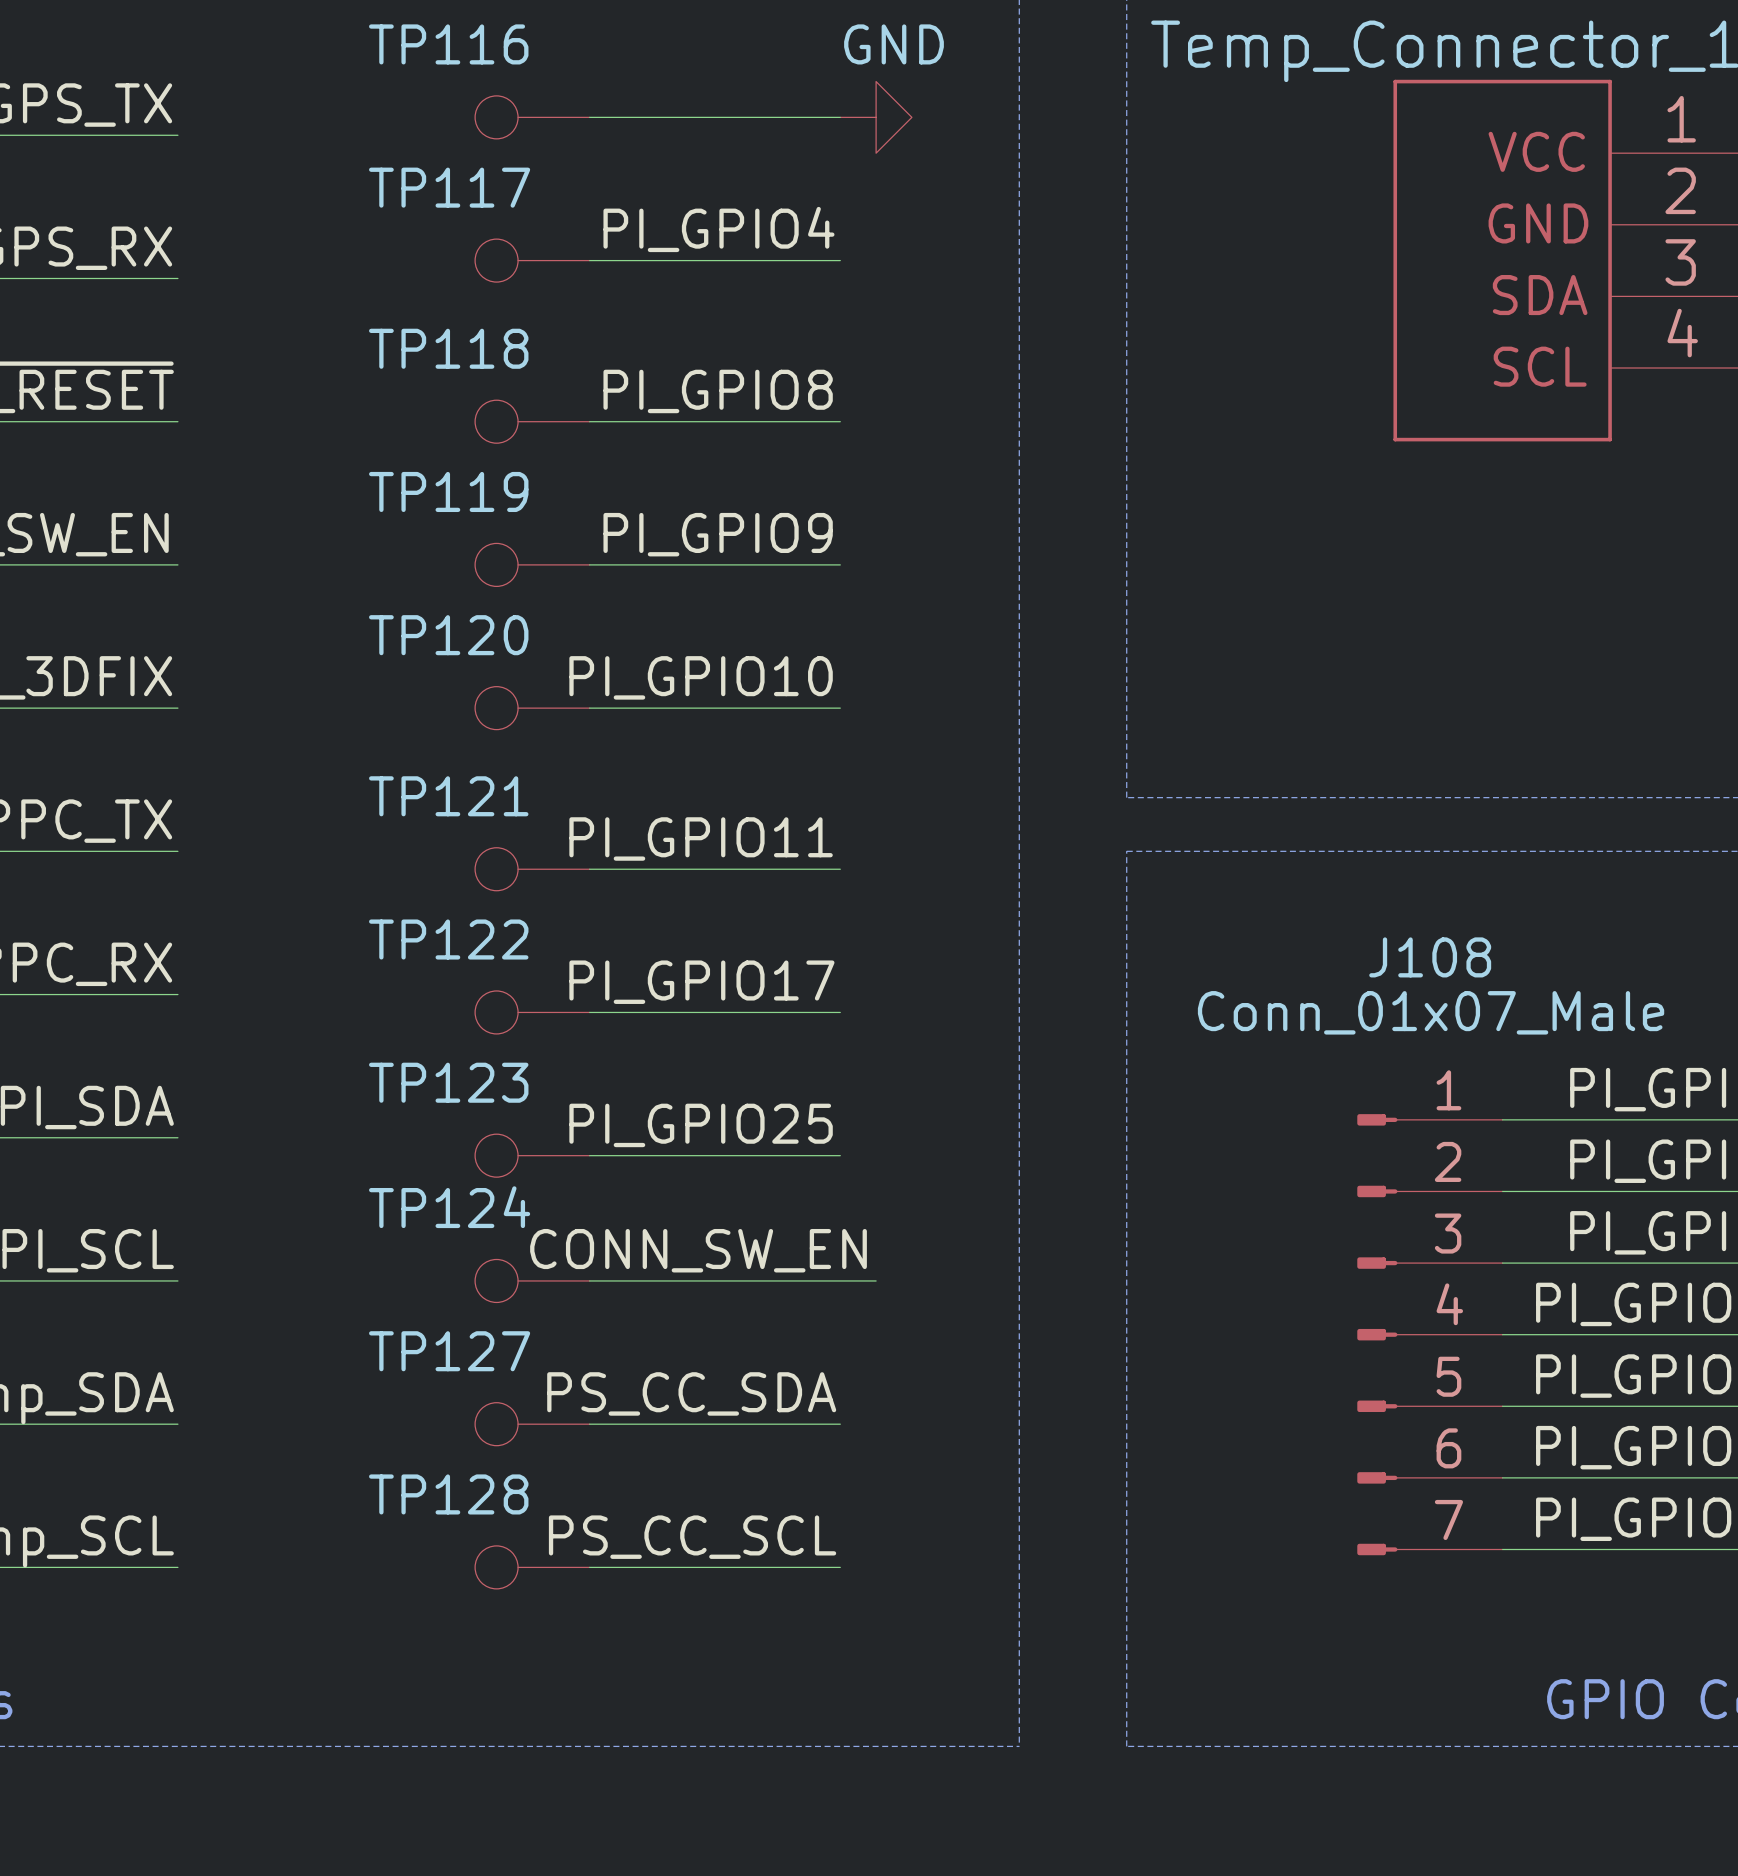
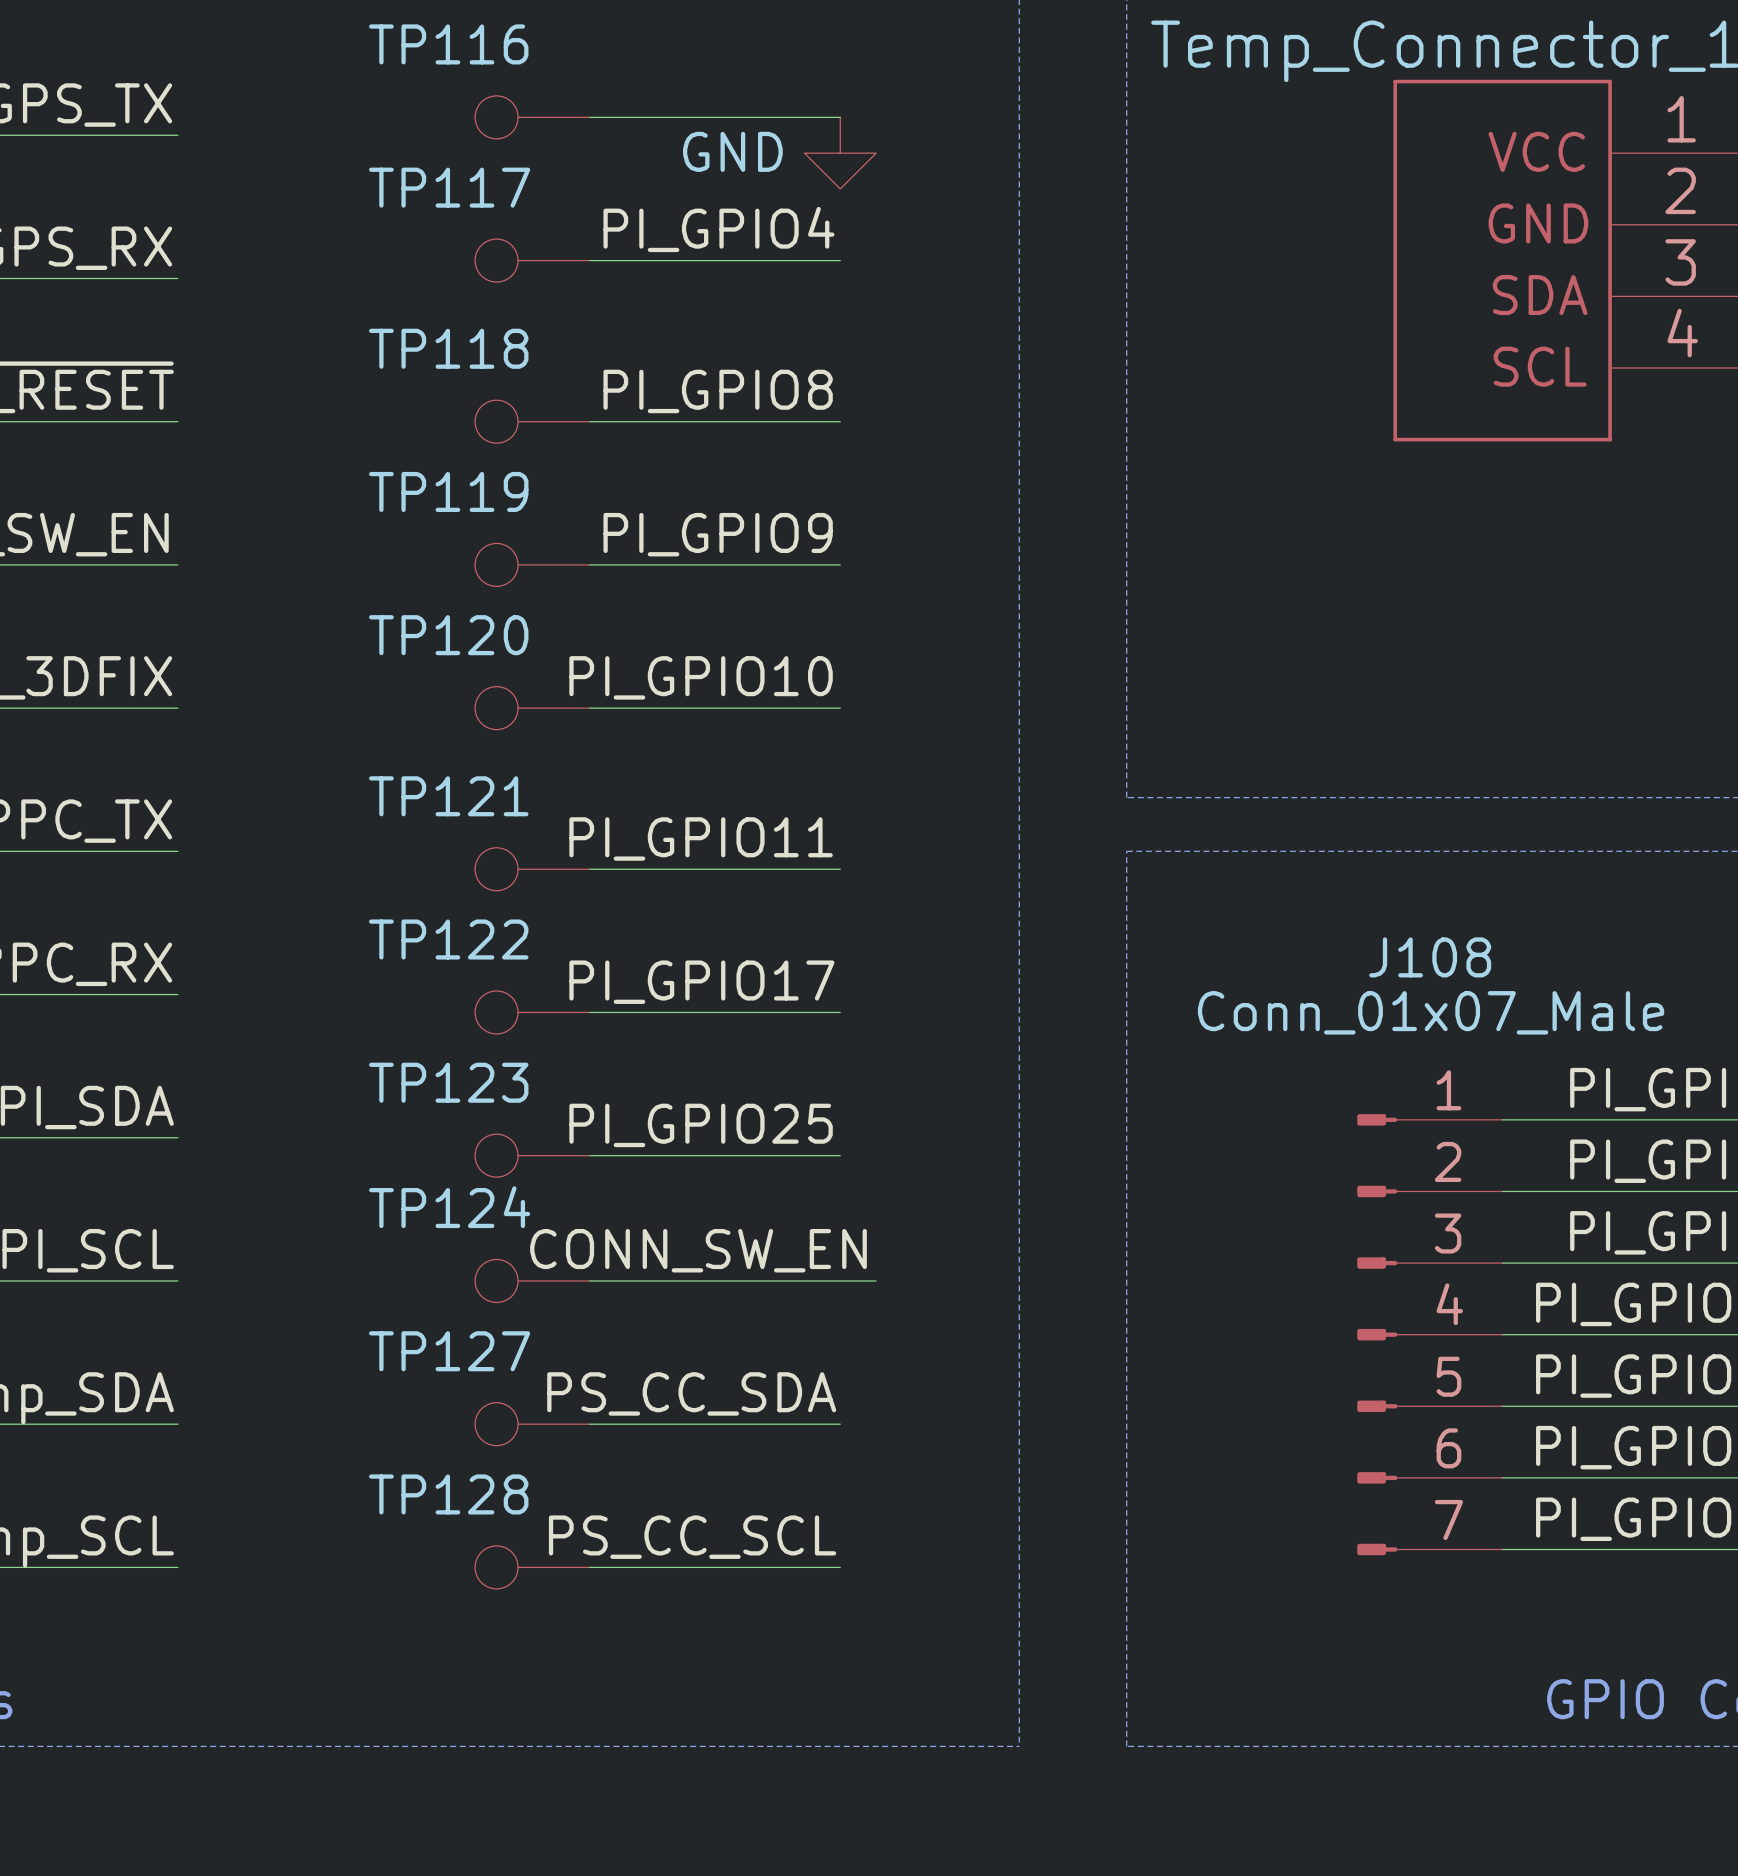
power symbol text position: GND (893, 44) -> GND (732, 151)
power symbol rotation: 0° (876, 117) -> 90° clockwise (840, 153)
power symbol position: GND (876, 117) -> GND (840, 153)

